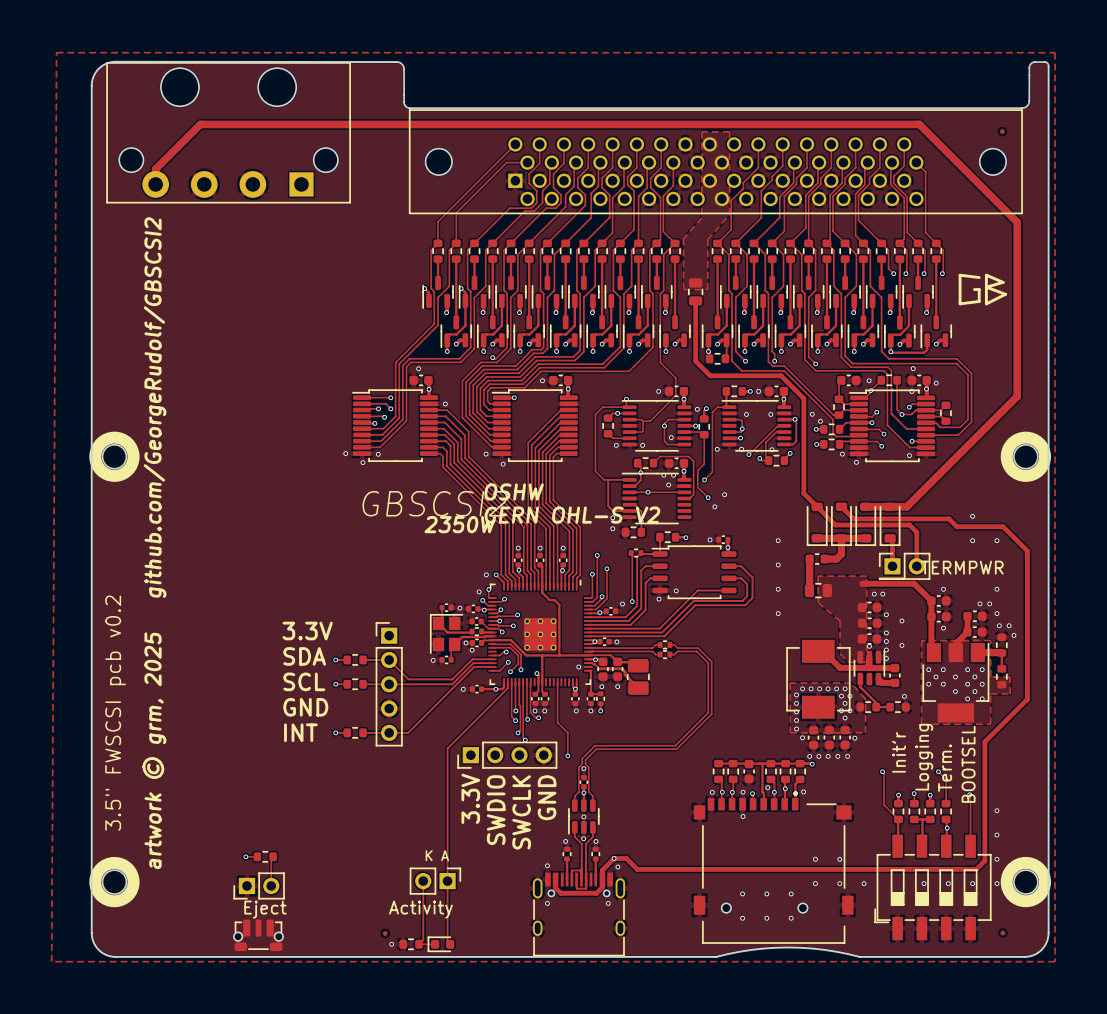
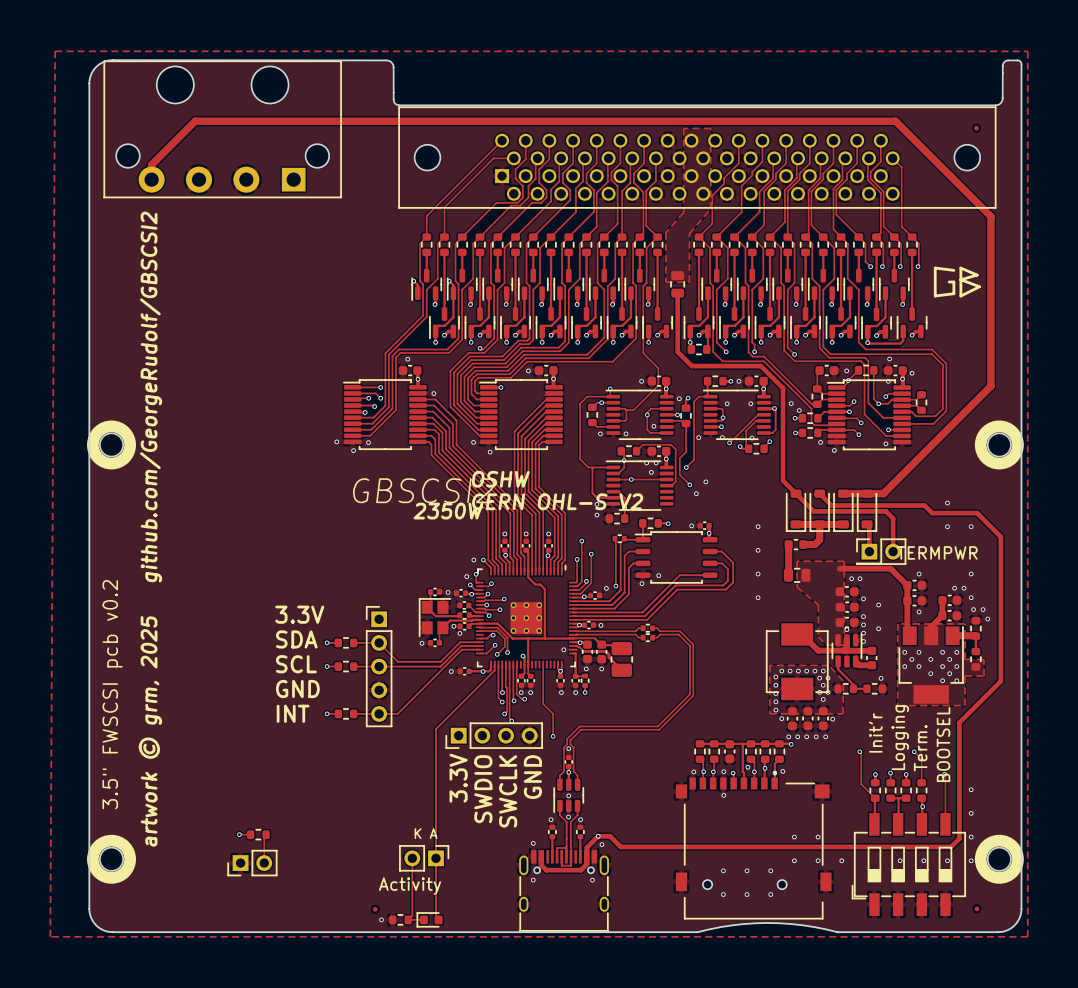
text: Eject (265, 909) -> none
part: (258, 935) -> none

